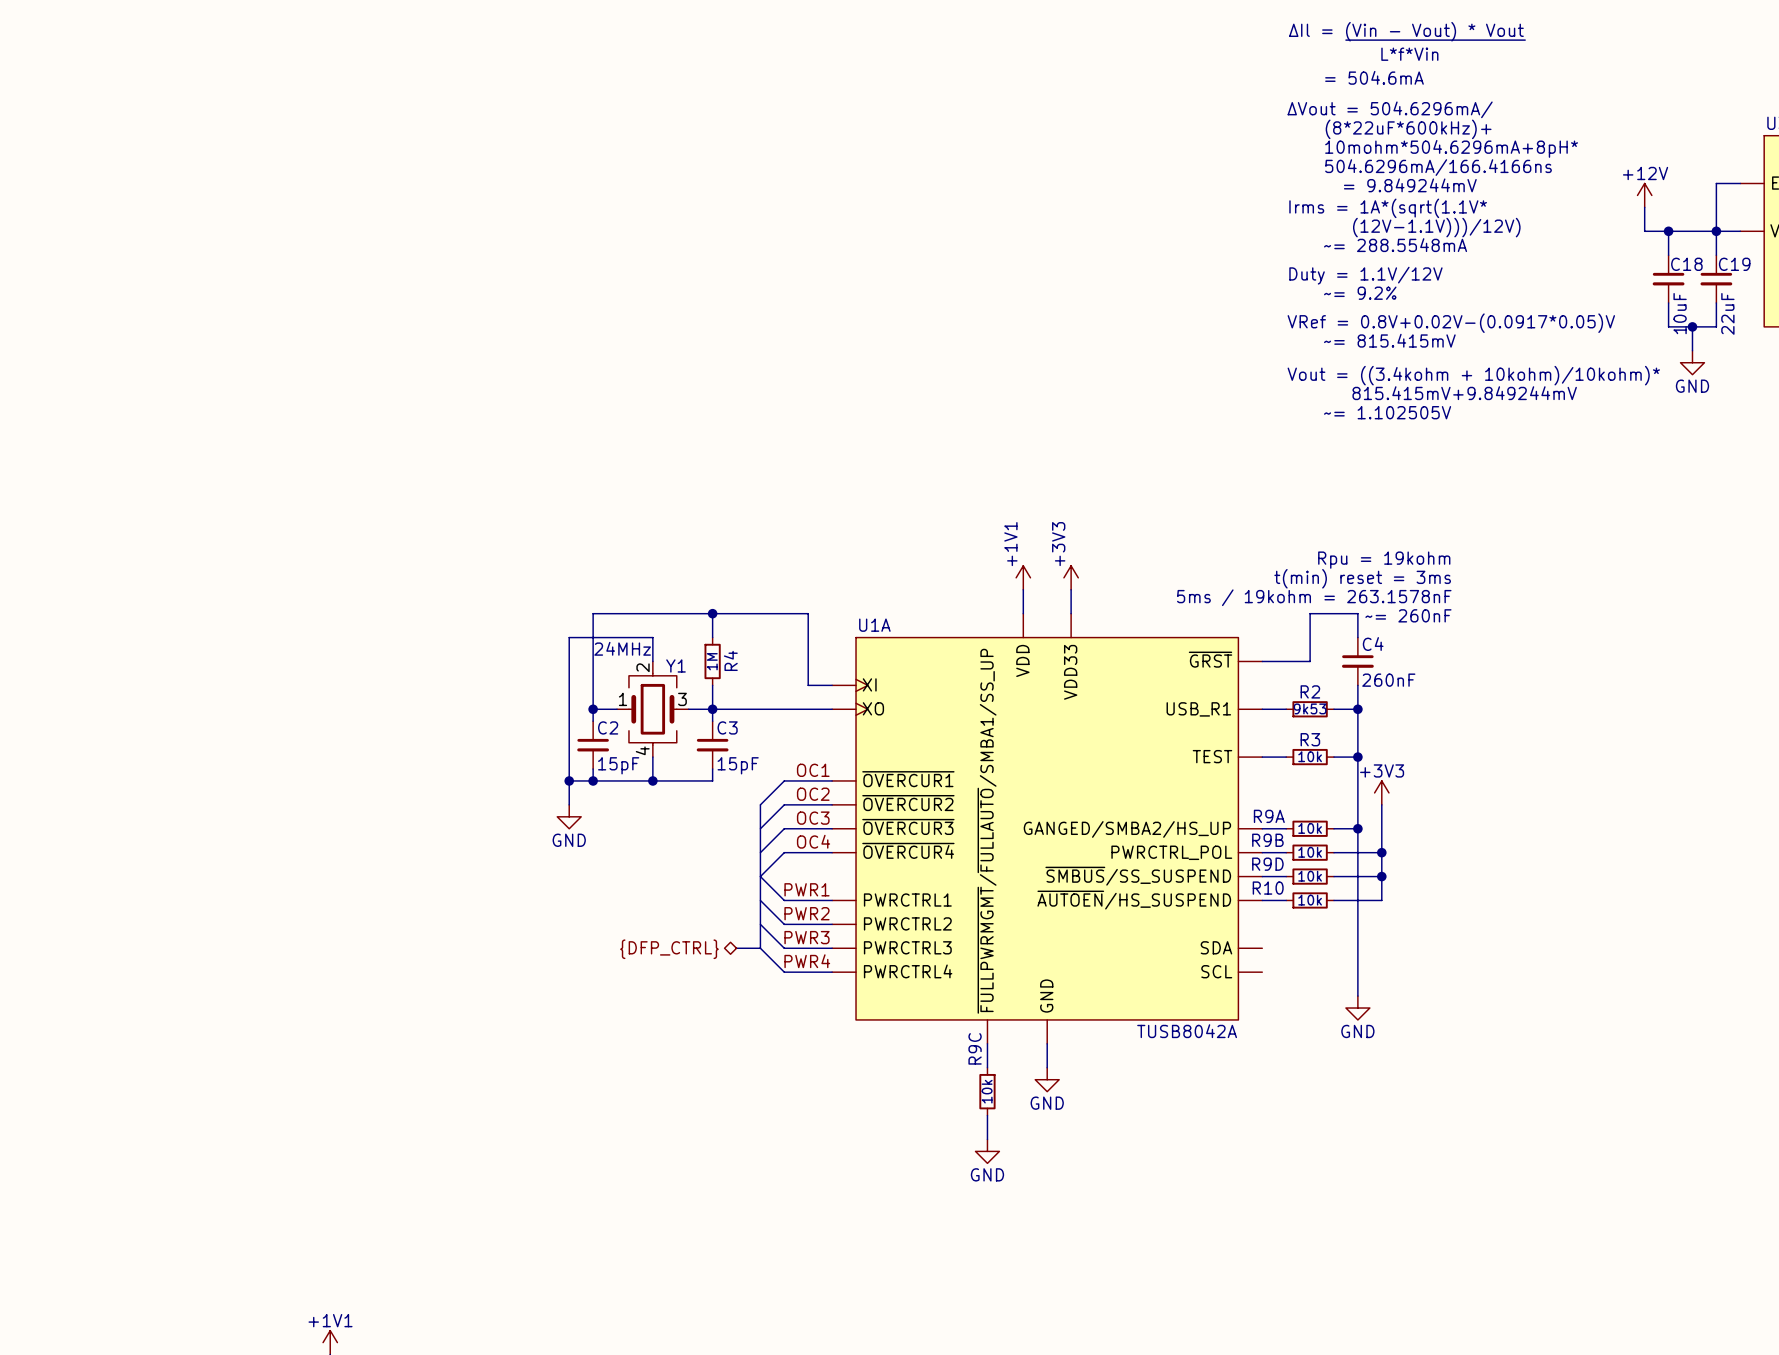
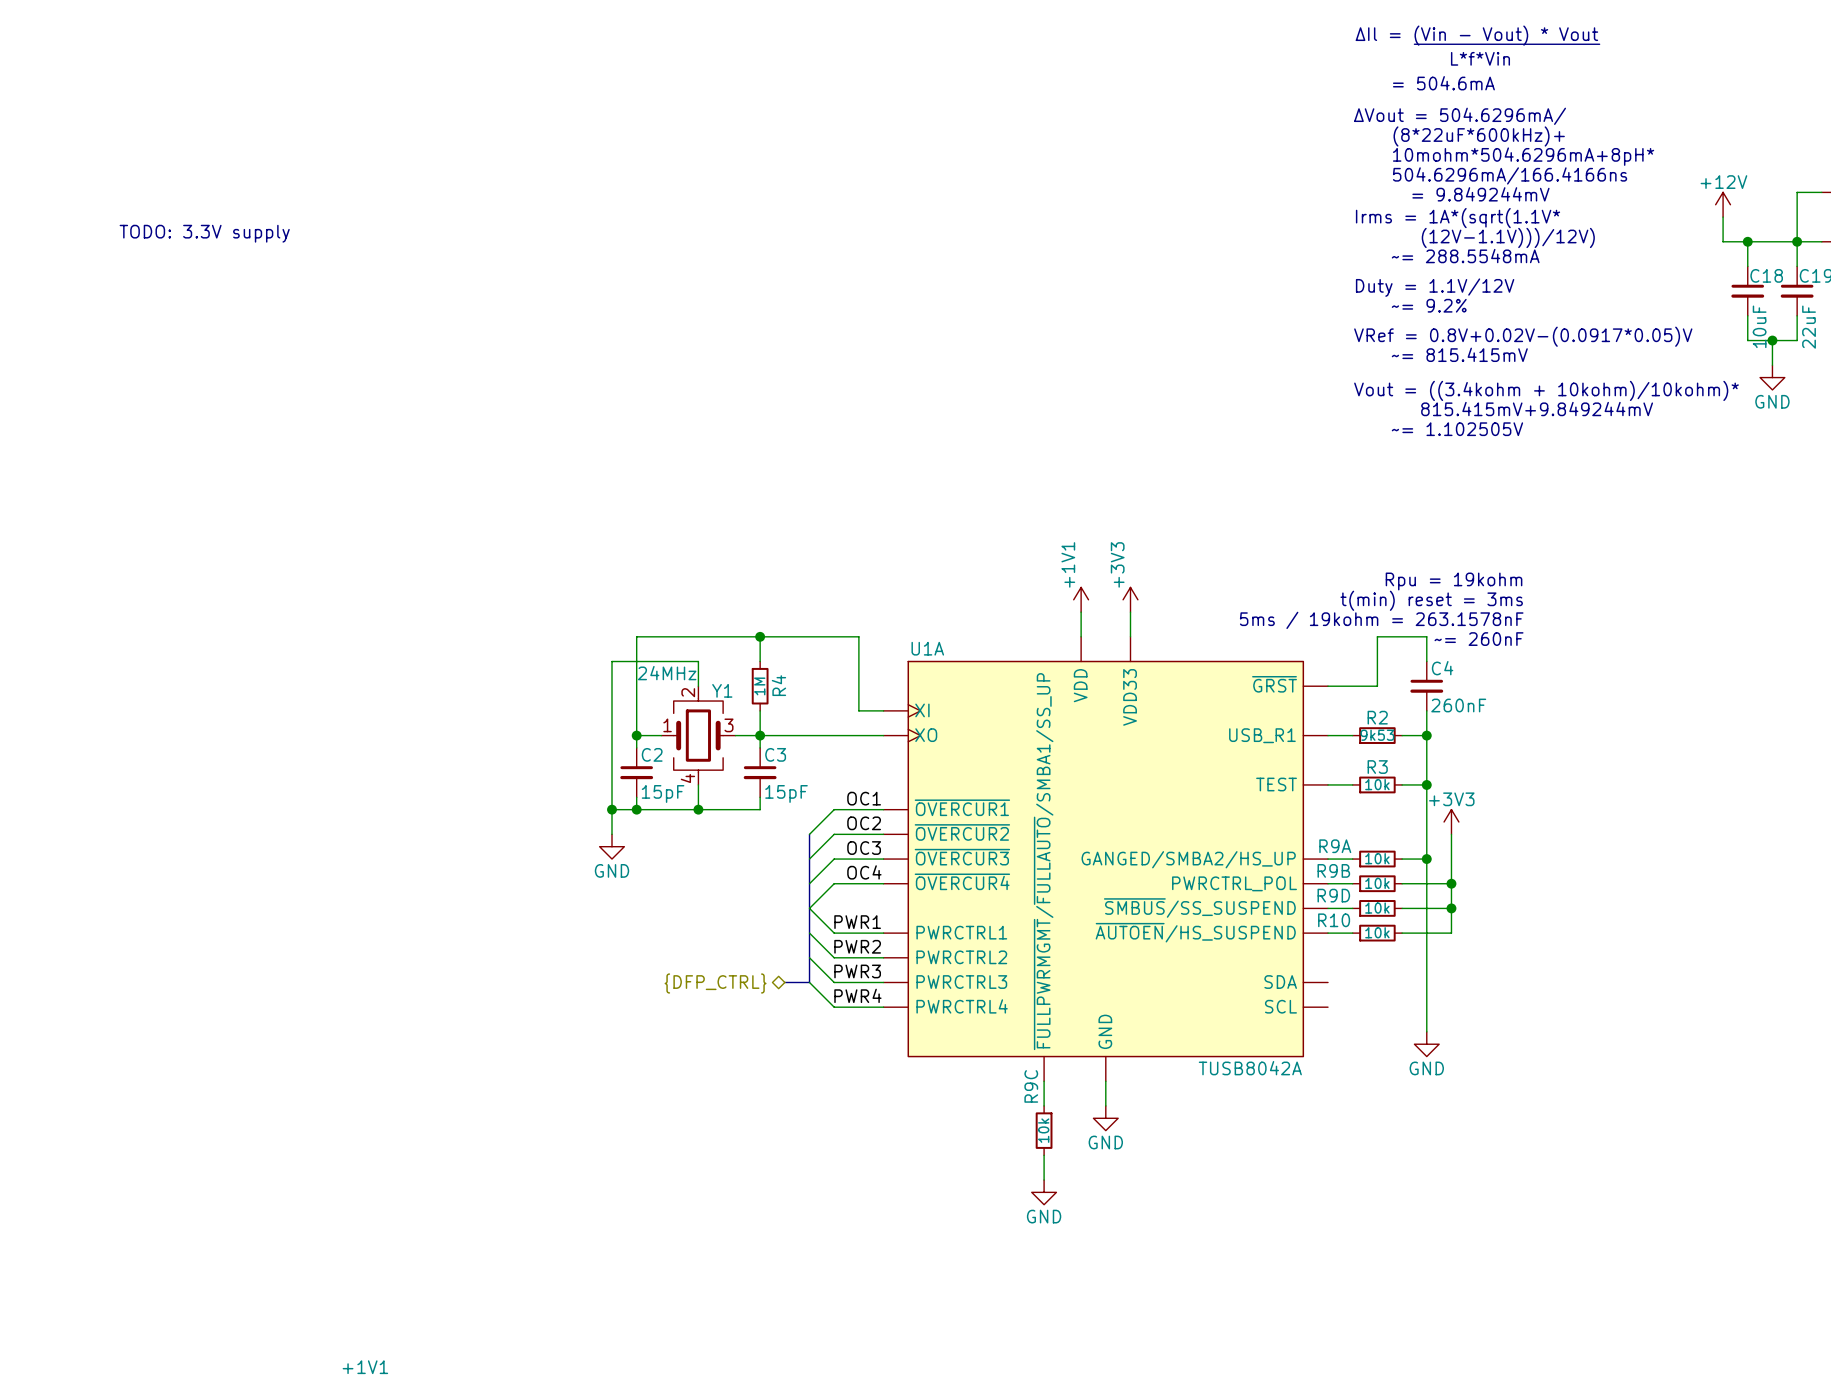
text: none -> TODO: 3.3V supply (204, 233)

